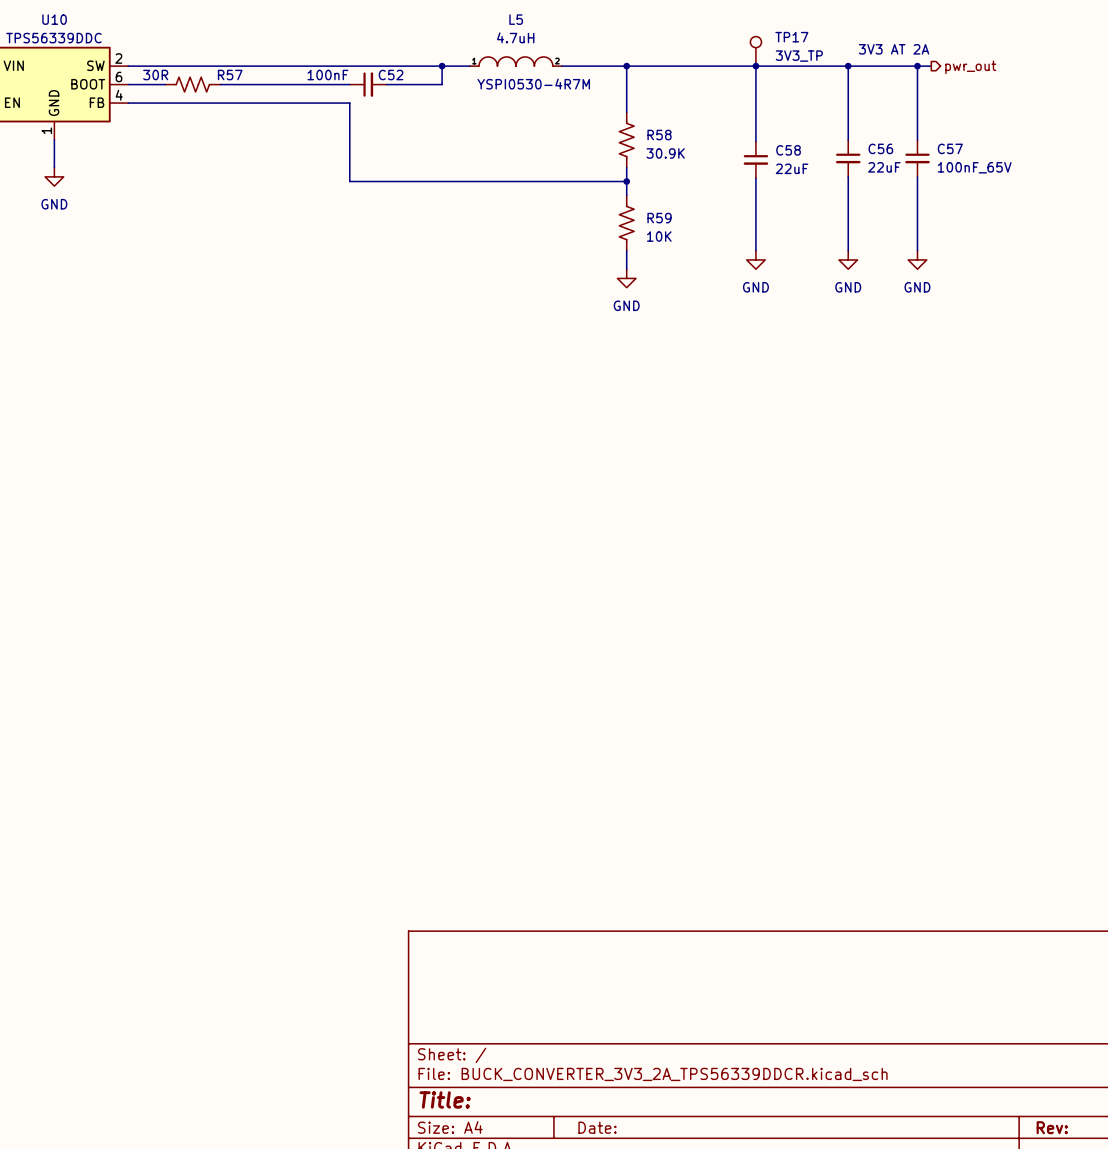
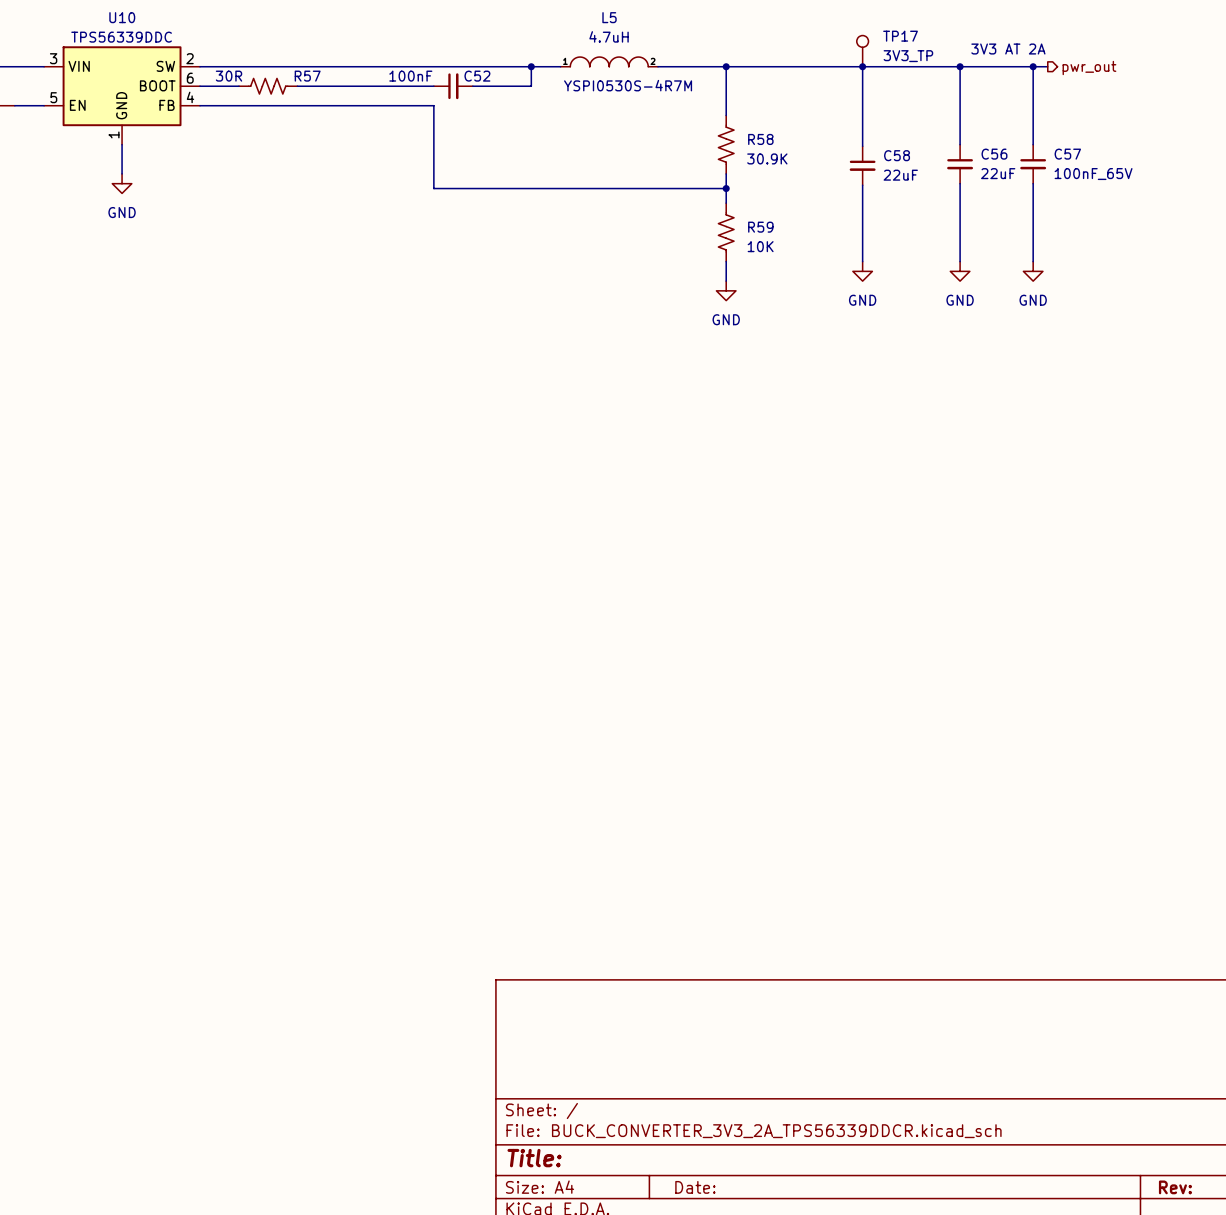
L5 text: YSPI0530-4R7M (533, 84) -> YSPI0530S-4R7M (628, 85)

